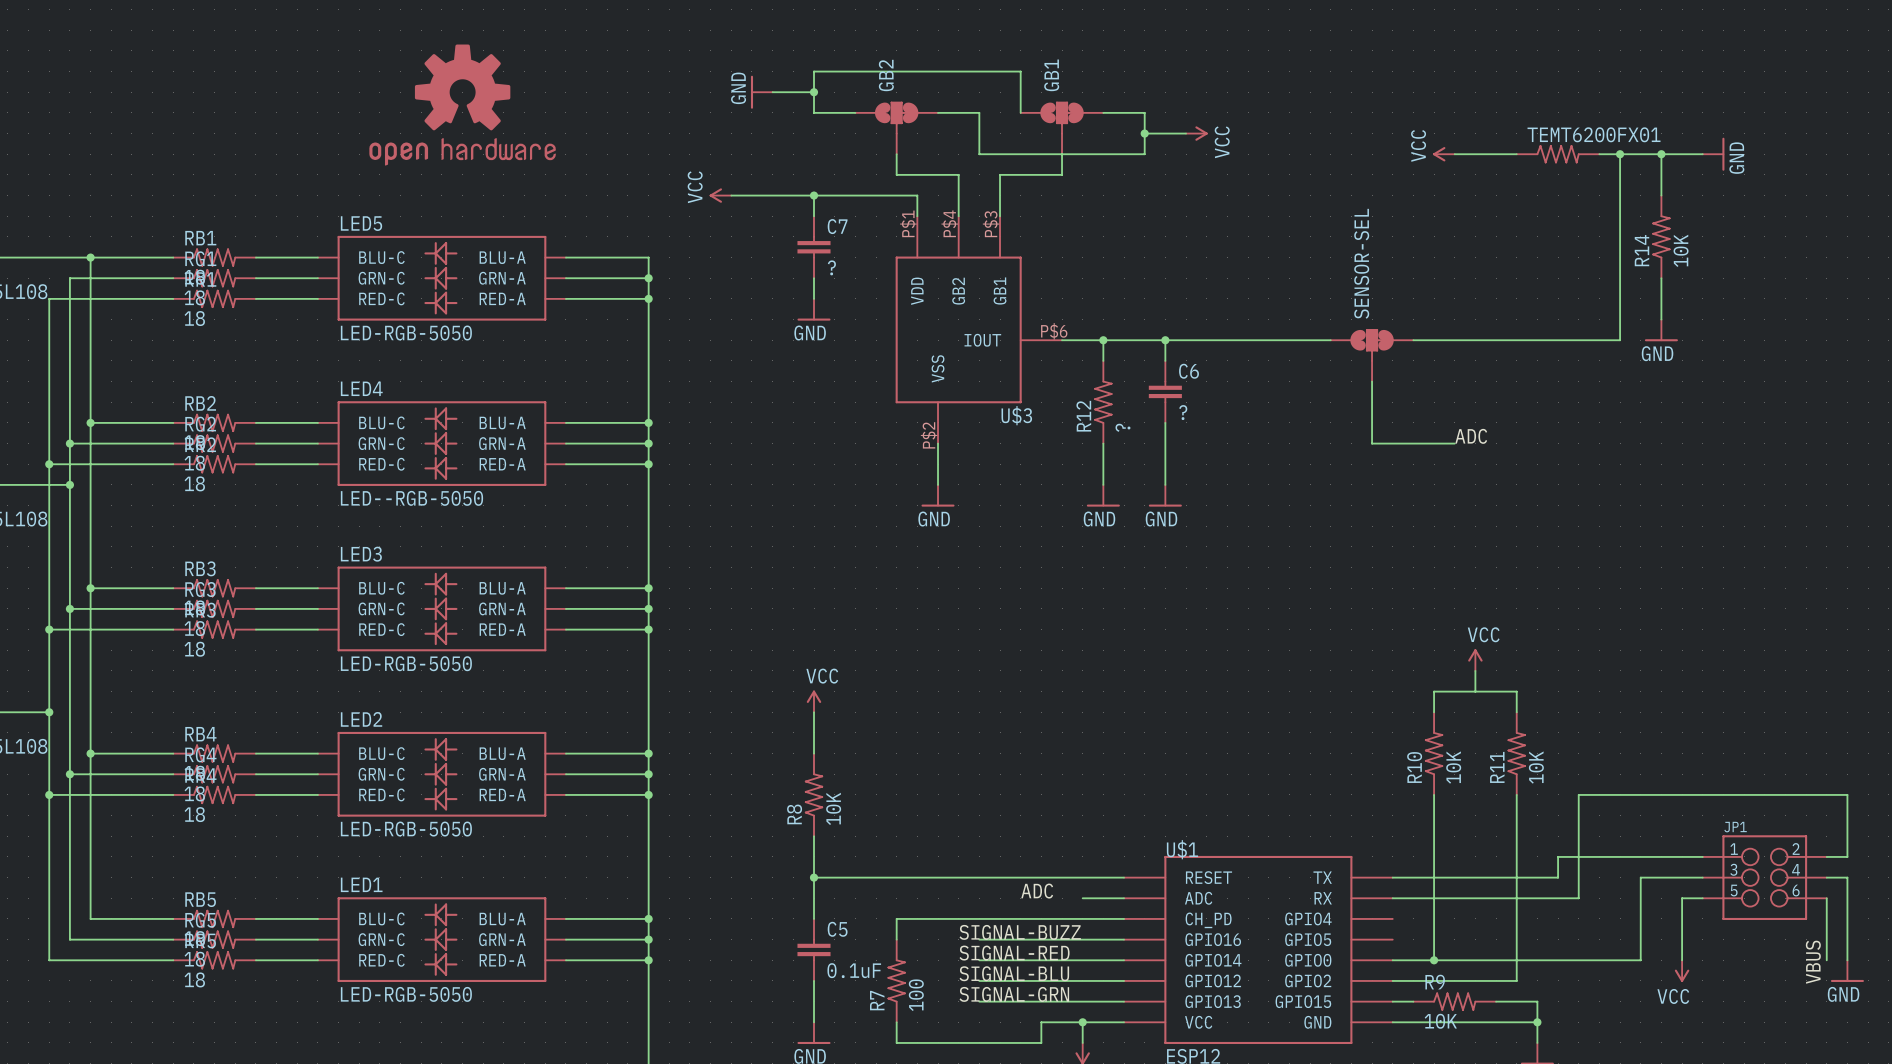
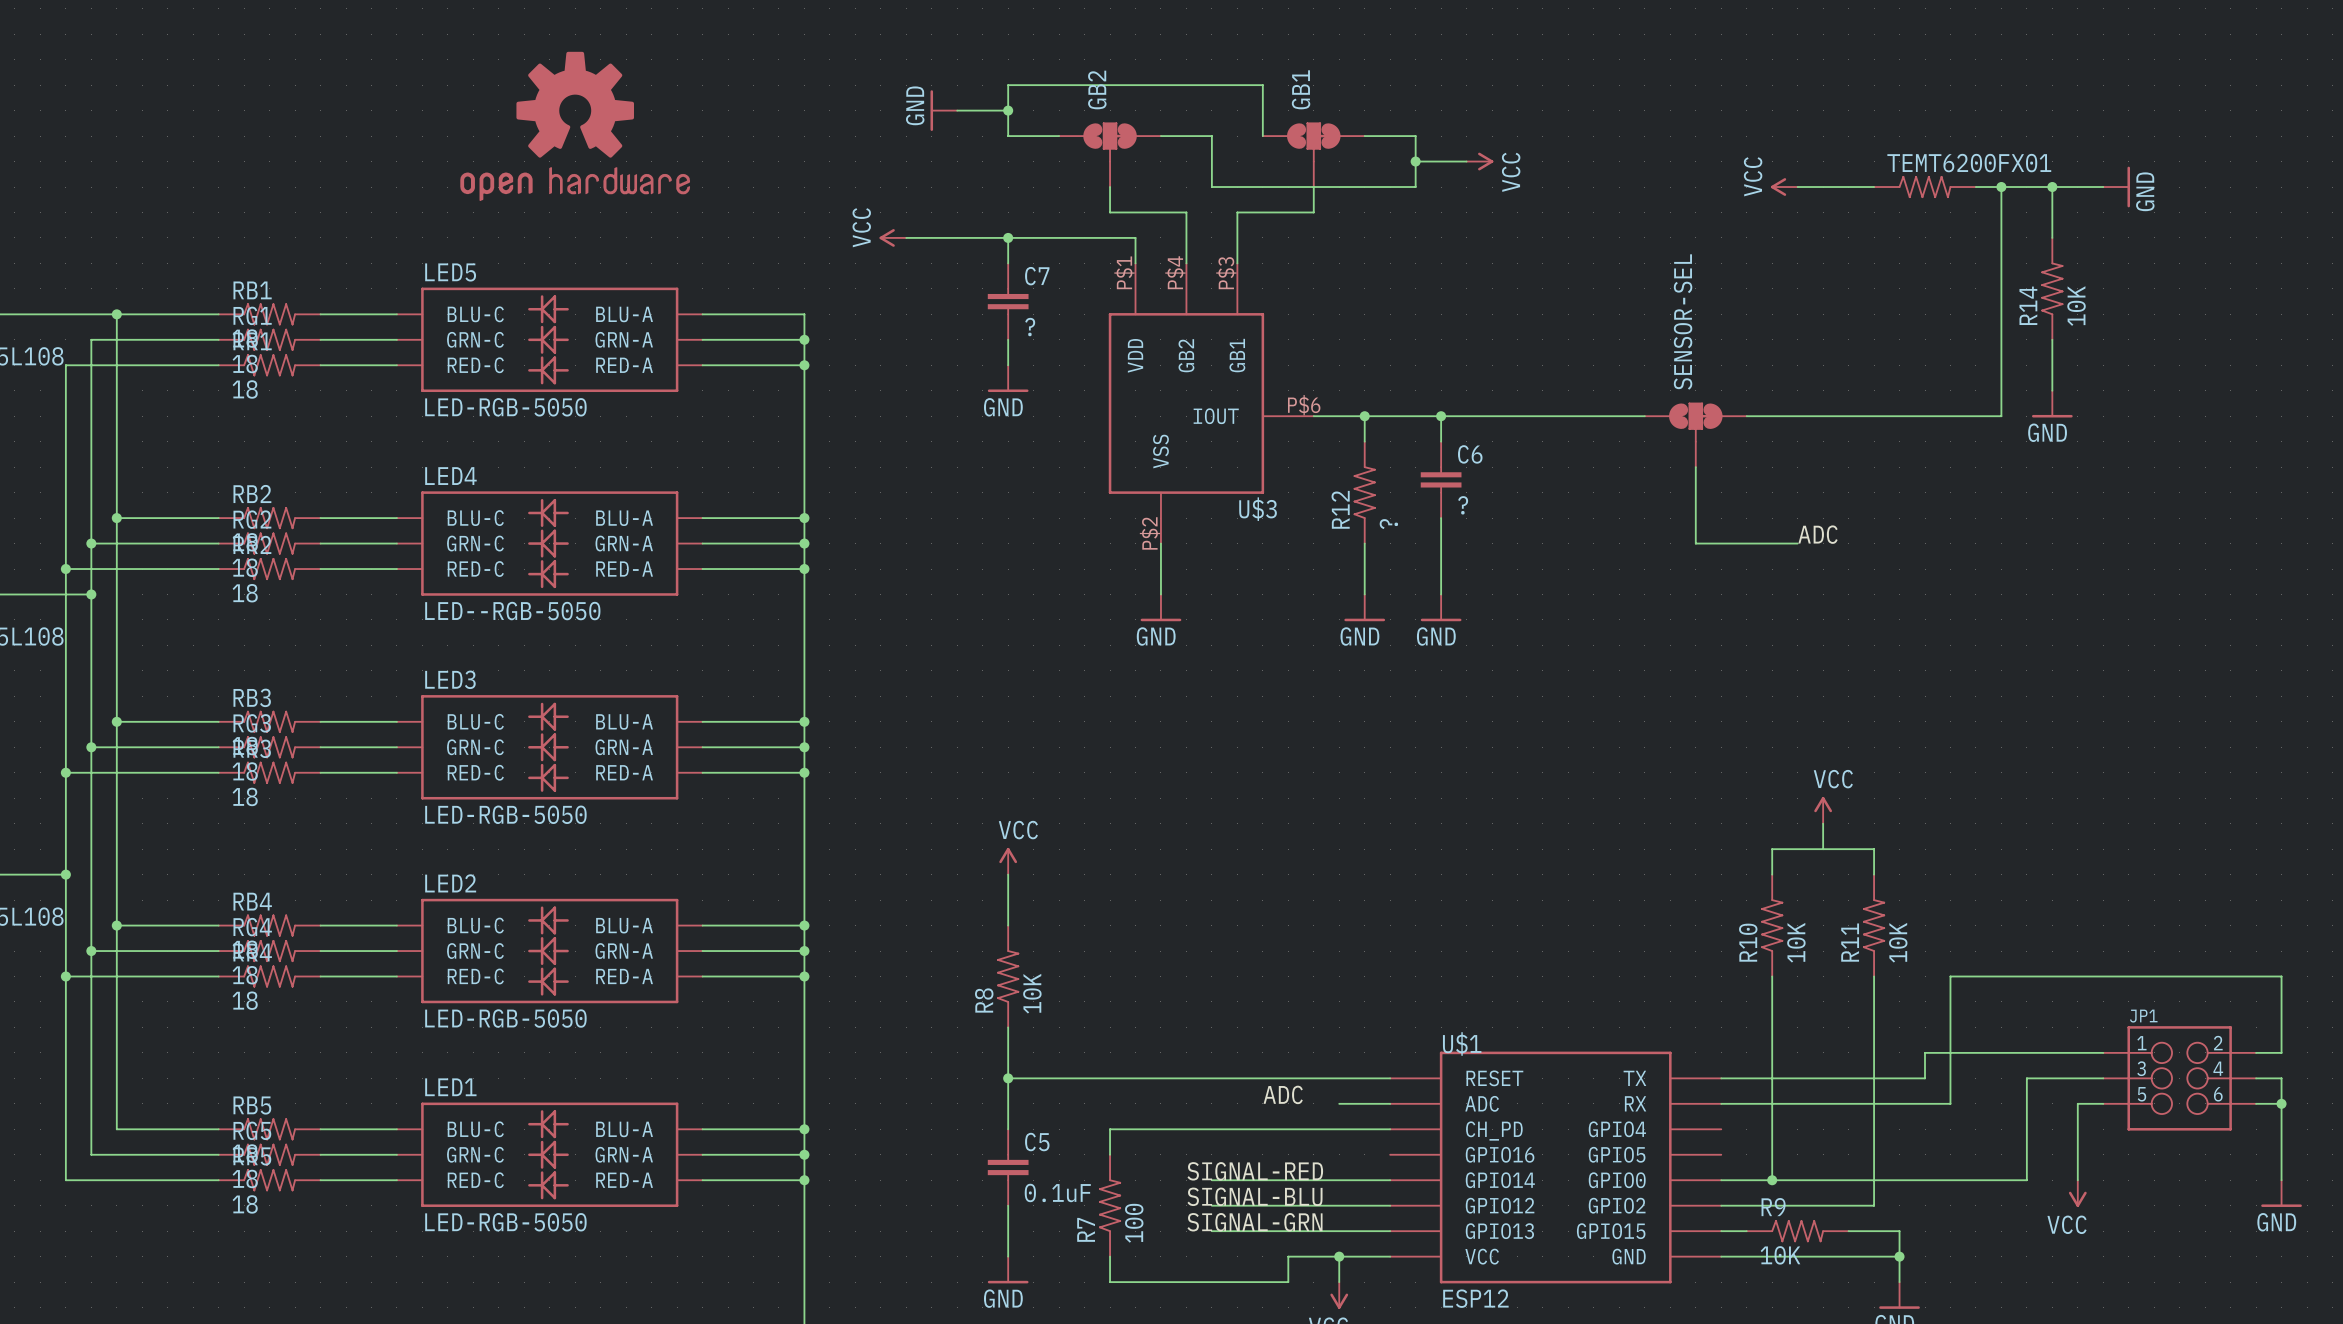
wire: (1826, 898) (1826, 960) -> (2256, 1103) (2281, 1103)
junction: none -> (2281, 1103)
label: SIGNAL-BUZZ (1020, 932) -> none
wire: (979, 939) (1124, 939) -> none
label: VBUS (1813, 962) -> none

